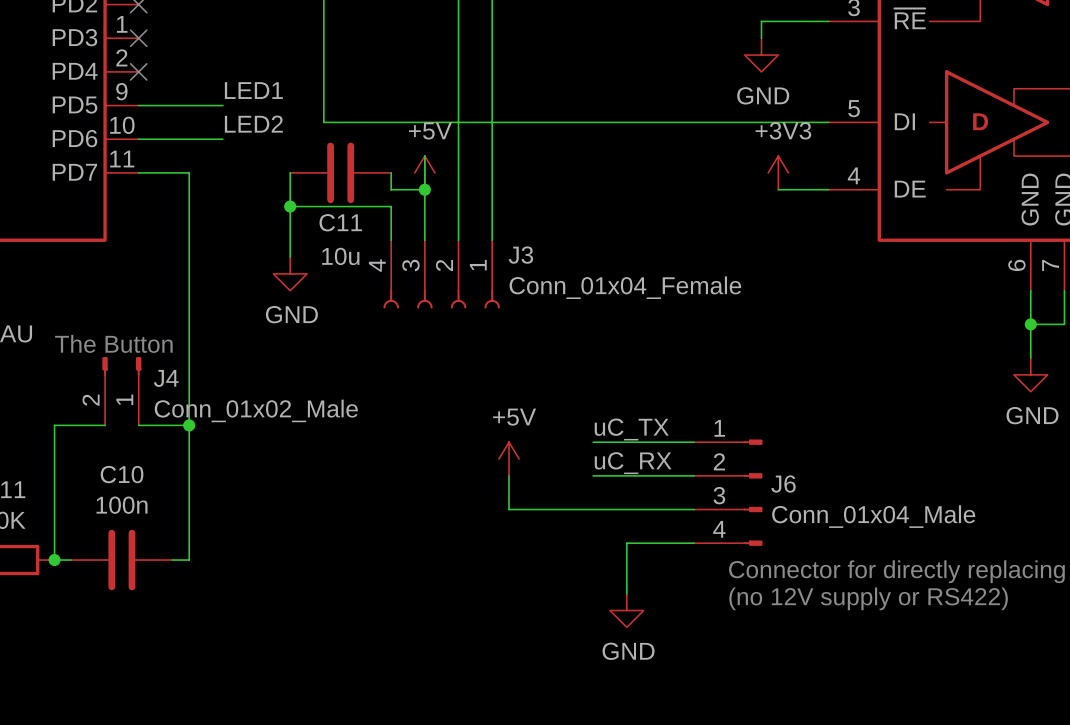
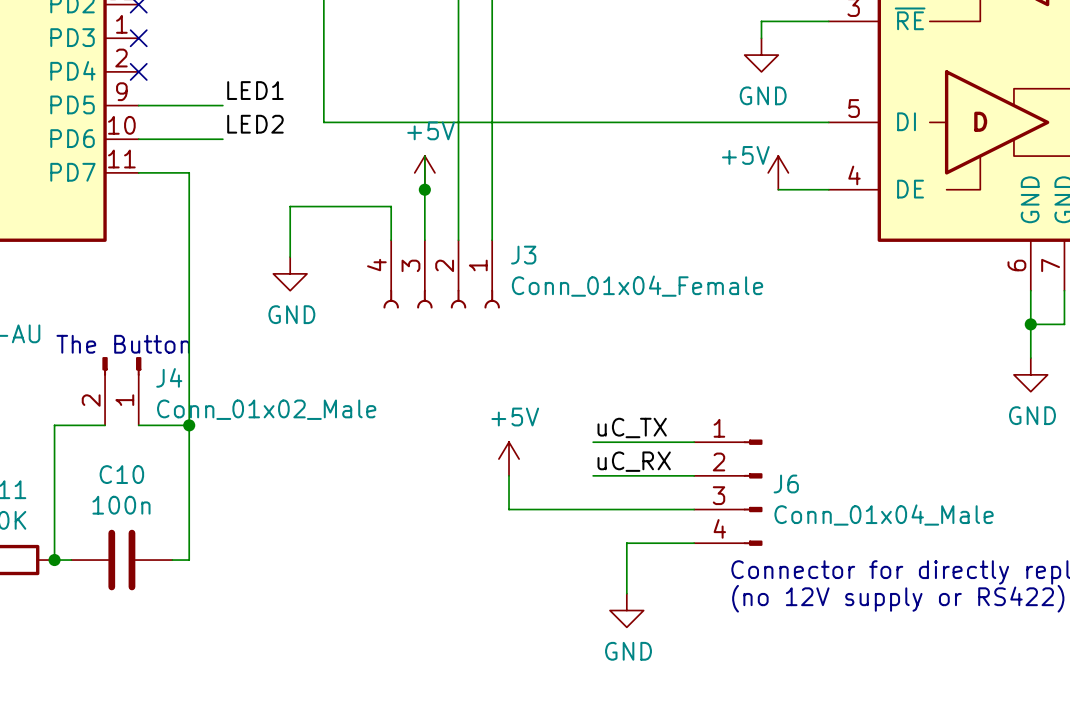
wire: (290, 172) (290, 206) -> none
C11: 10u (340, 172) -> none
wire: (391, 172) (391, 189) (424, 189) -> none
power symbol: +3V3 (778, 172) -> +5V (778, 172)
junction: (290, 206) -> none

